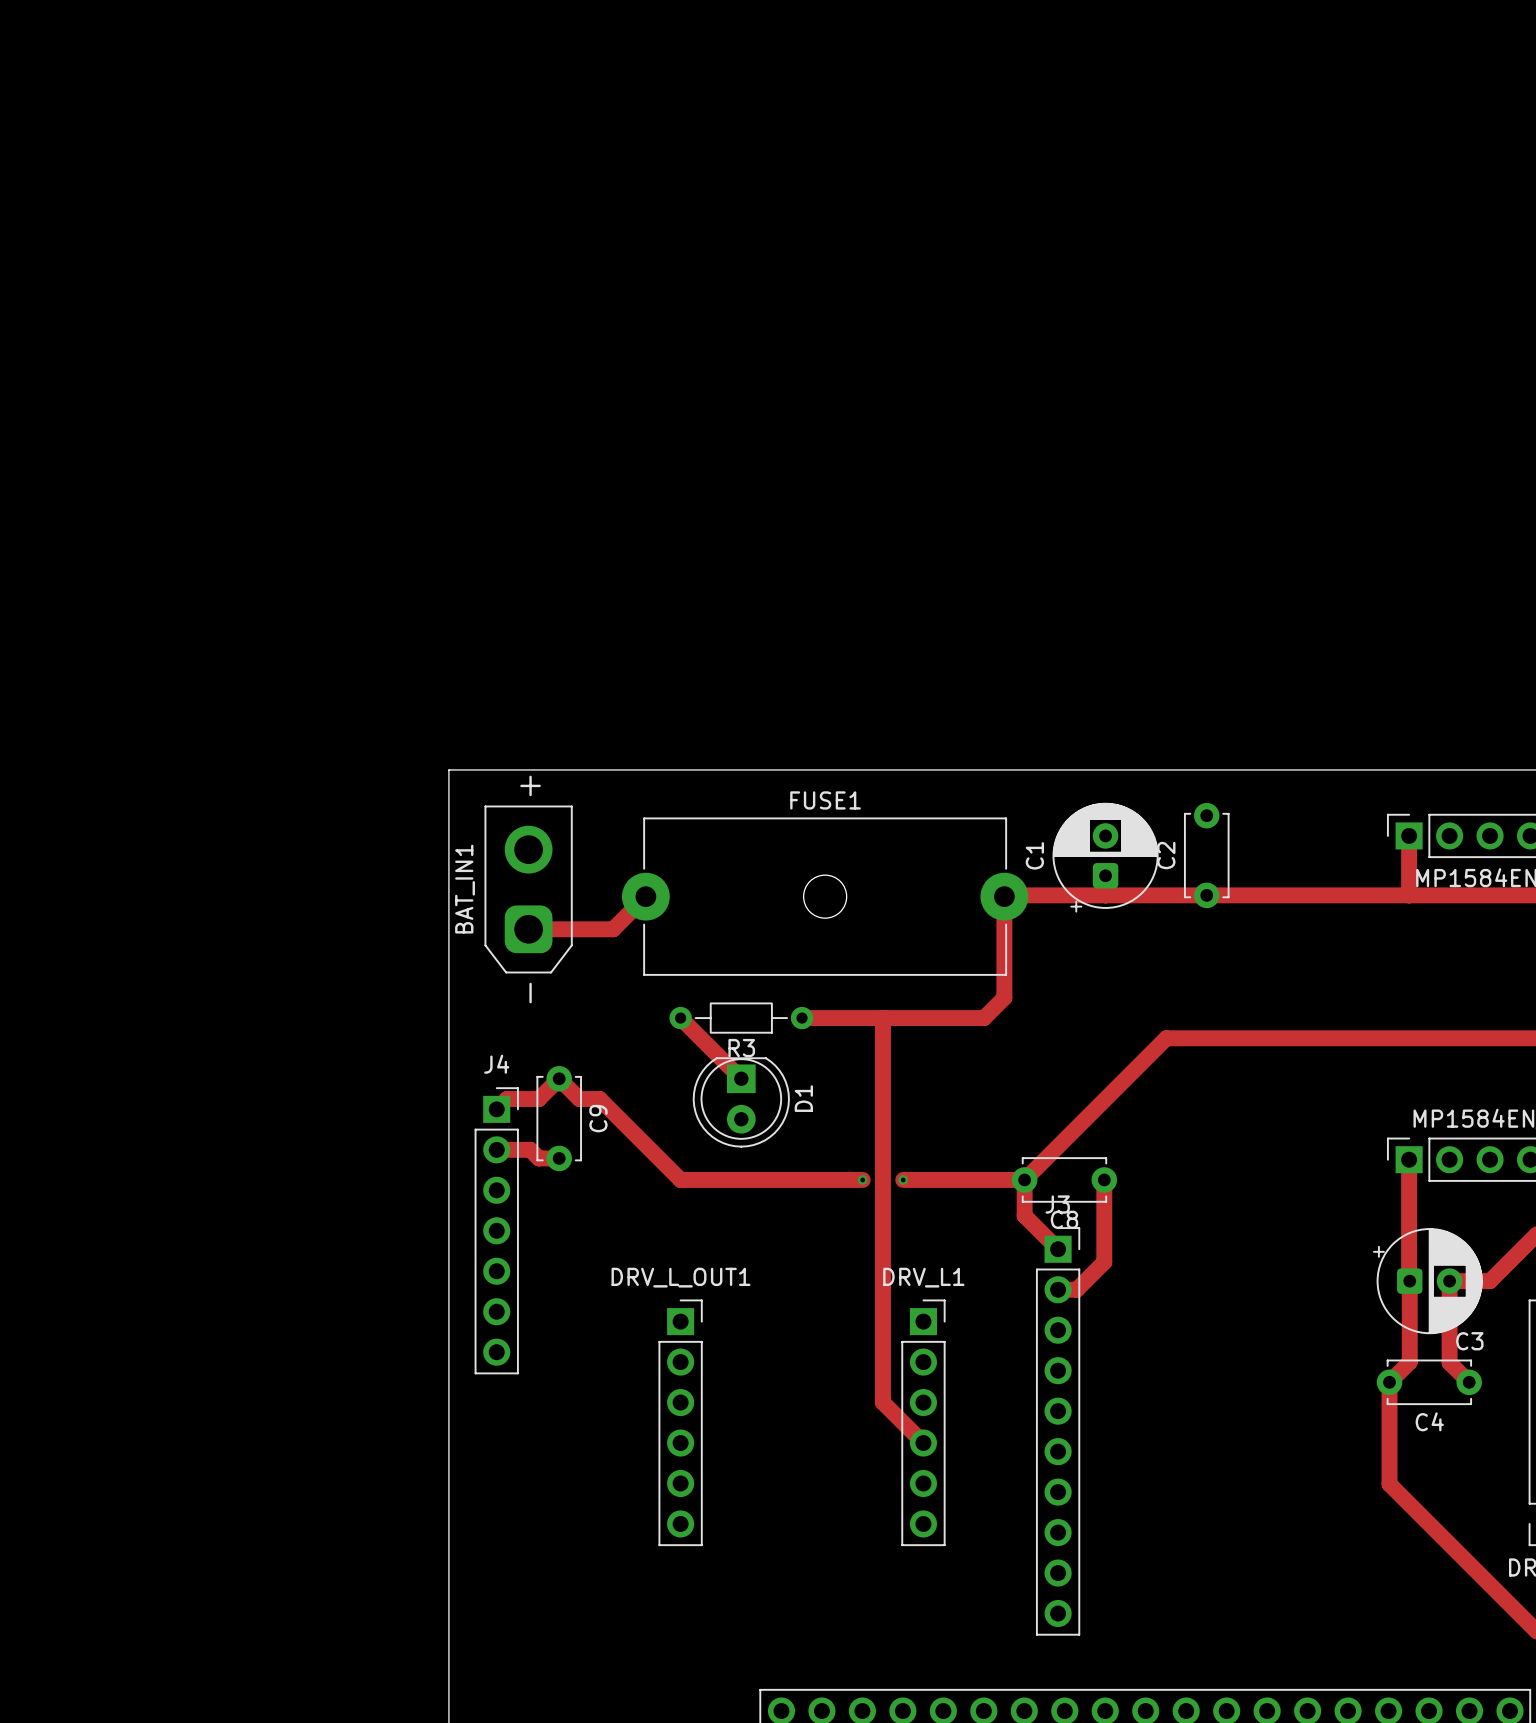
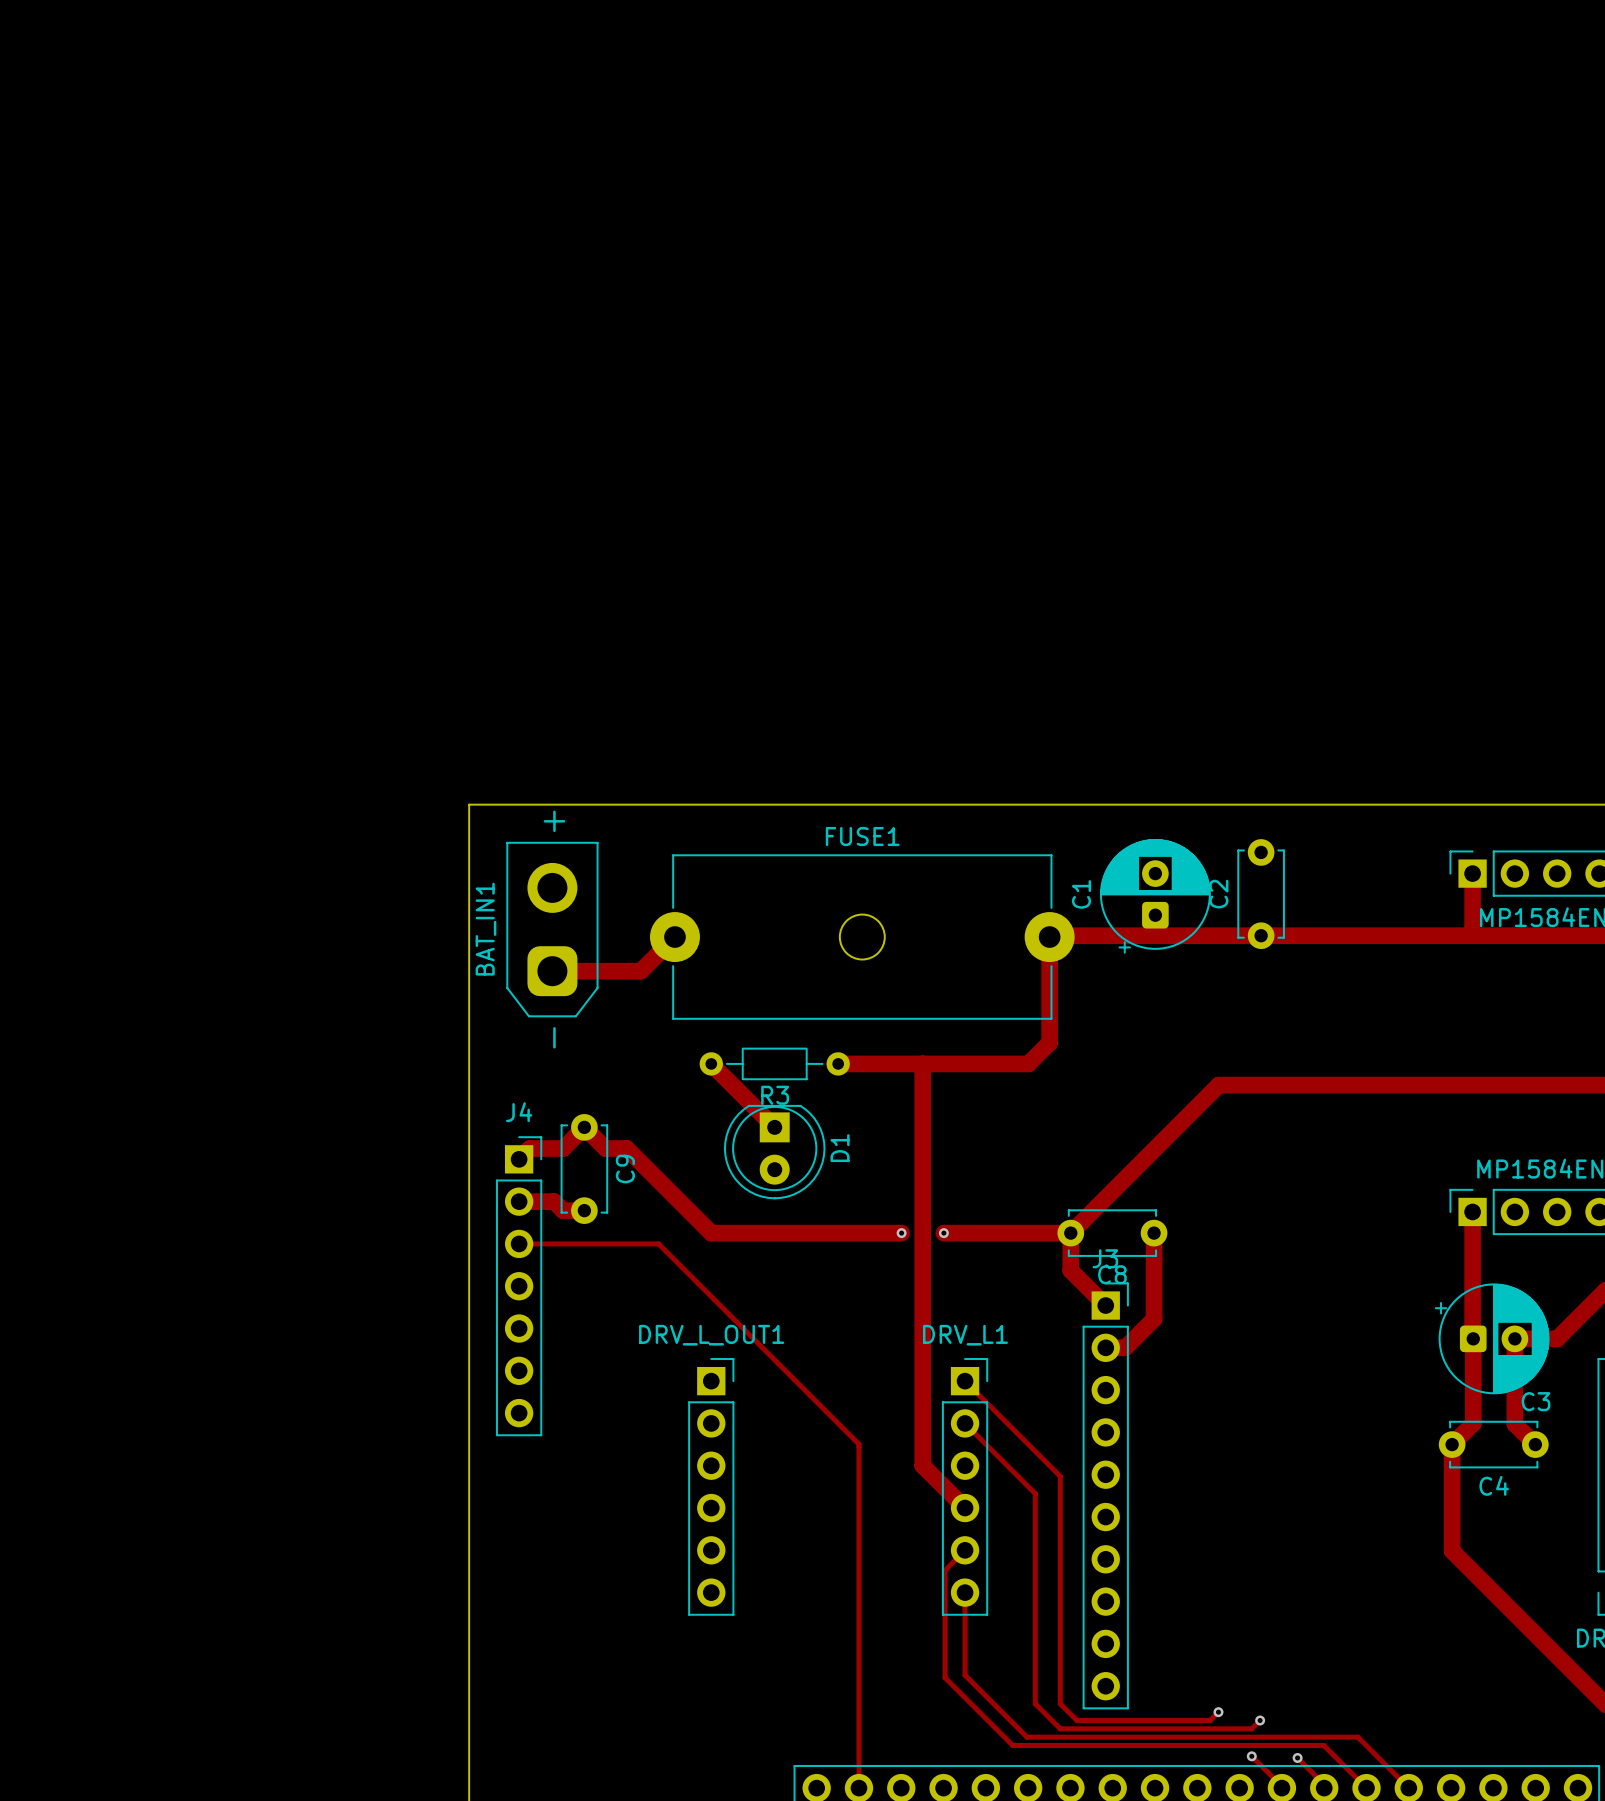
track: none -> (519, 1243) (658, 1243) (858, 1444) (858, 1788)
track: none -> (965, 1381) (1060, 1476) (1060, 1703) (1076, 1720) (1210, 1720) (1218, 1712)
track: none -> (965, 1423) (1035, 1493) (1035, 1703) (1060, 1728) (1251, 1728) (1260, 1720)
track: none -> (965, 1550) (945, 1570) (945, 1677) (1012, 1745) (1323, 1745) (1366, 1788)
track: none -> (965, 1592) (965, 1675) (1026, 1737) (1357, 1737) (1408, 1788)
via: none -> (1218, 1712)
via: none -> (1260, 1720)
track: none -> (1251, 1756) (1281, 1788)
via: none -> (1251, 1756)
track: none -> (1297, 1757) (1324, 1784) (1324, 1788)
via: none -> (1297, 1757)

